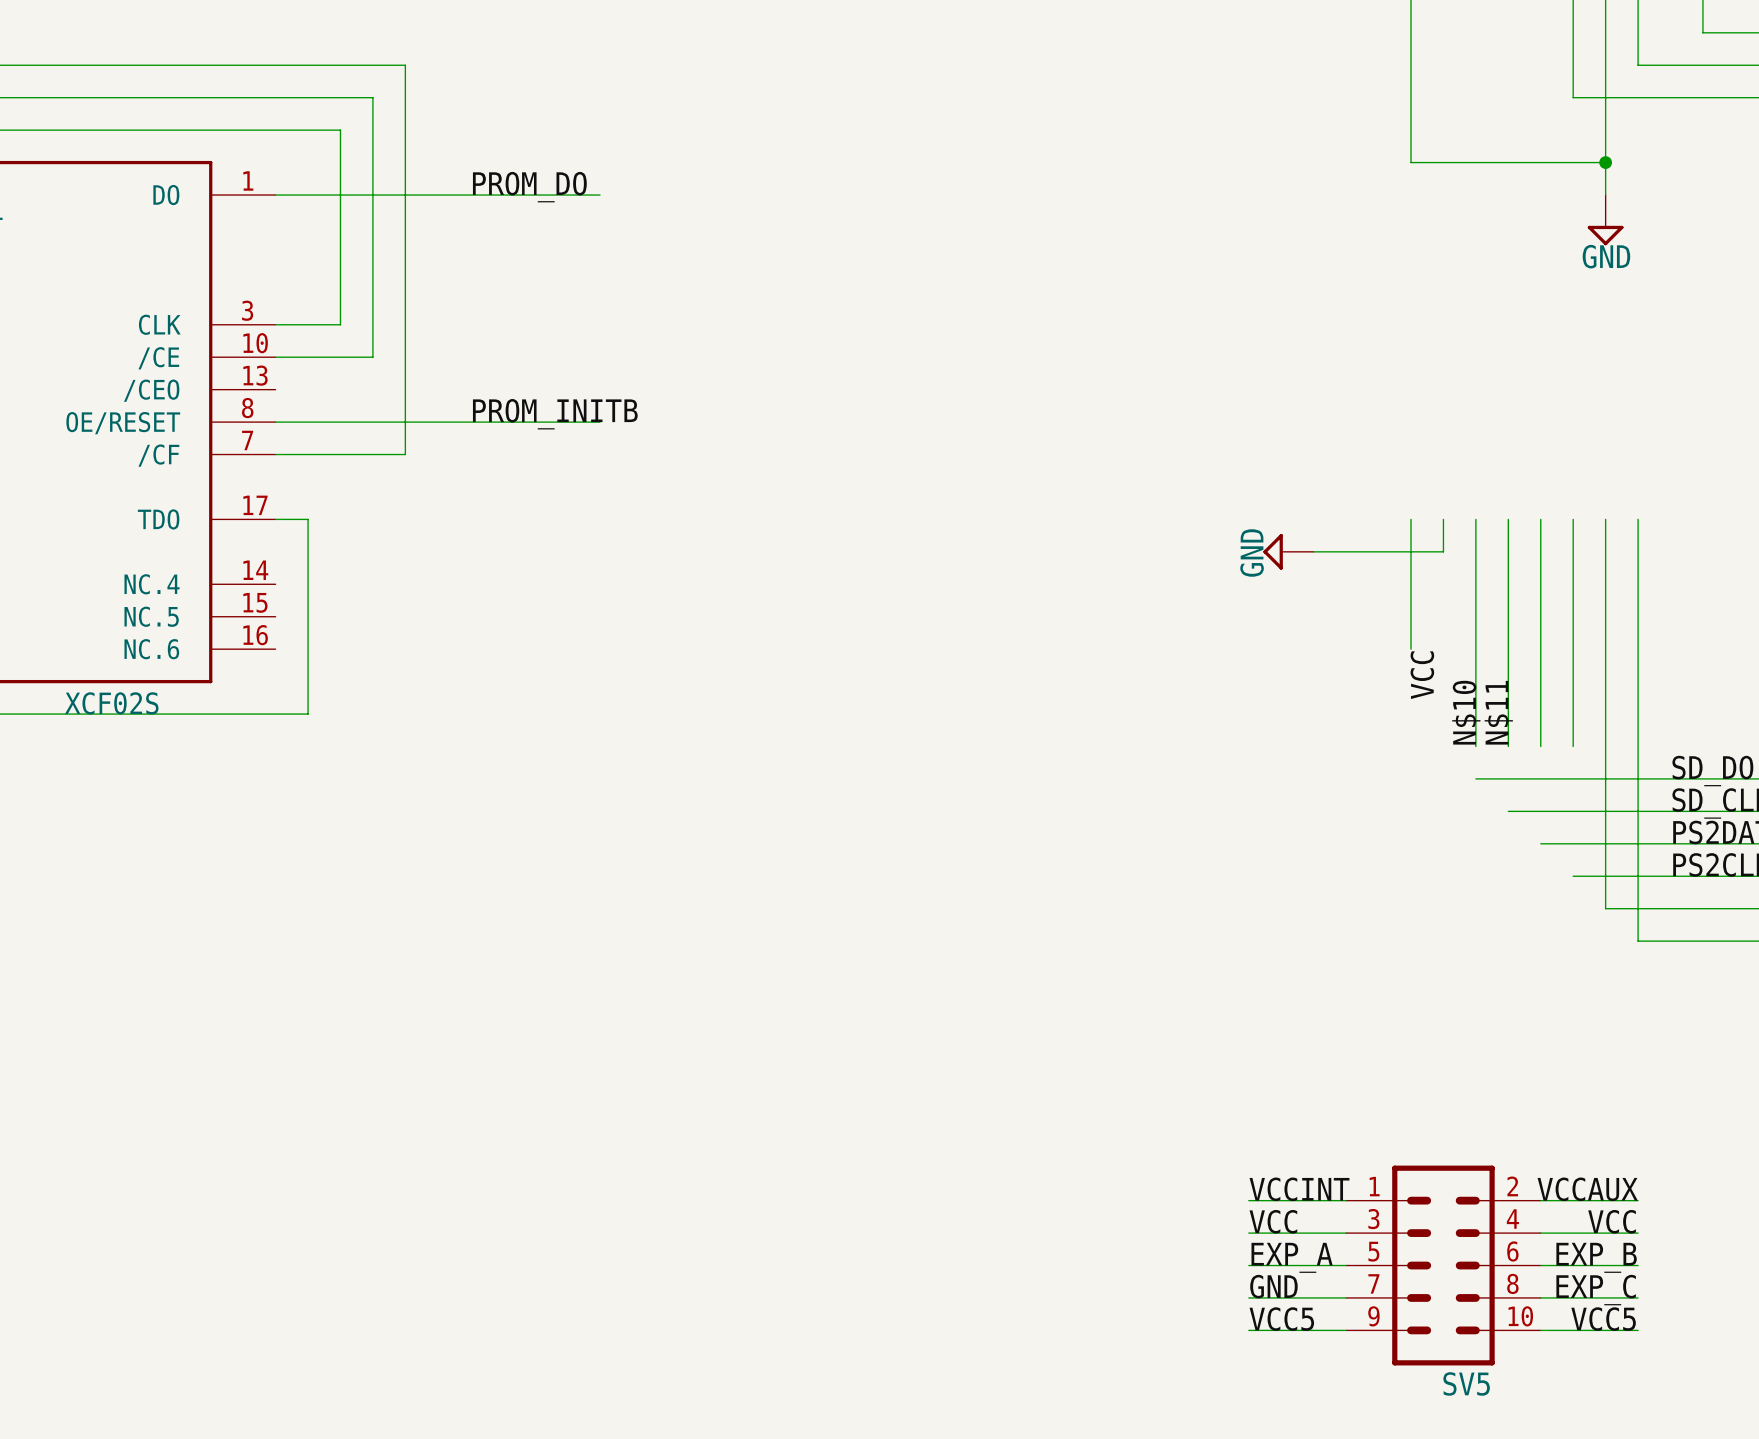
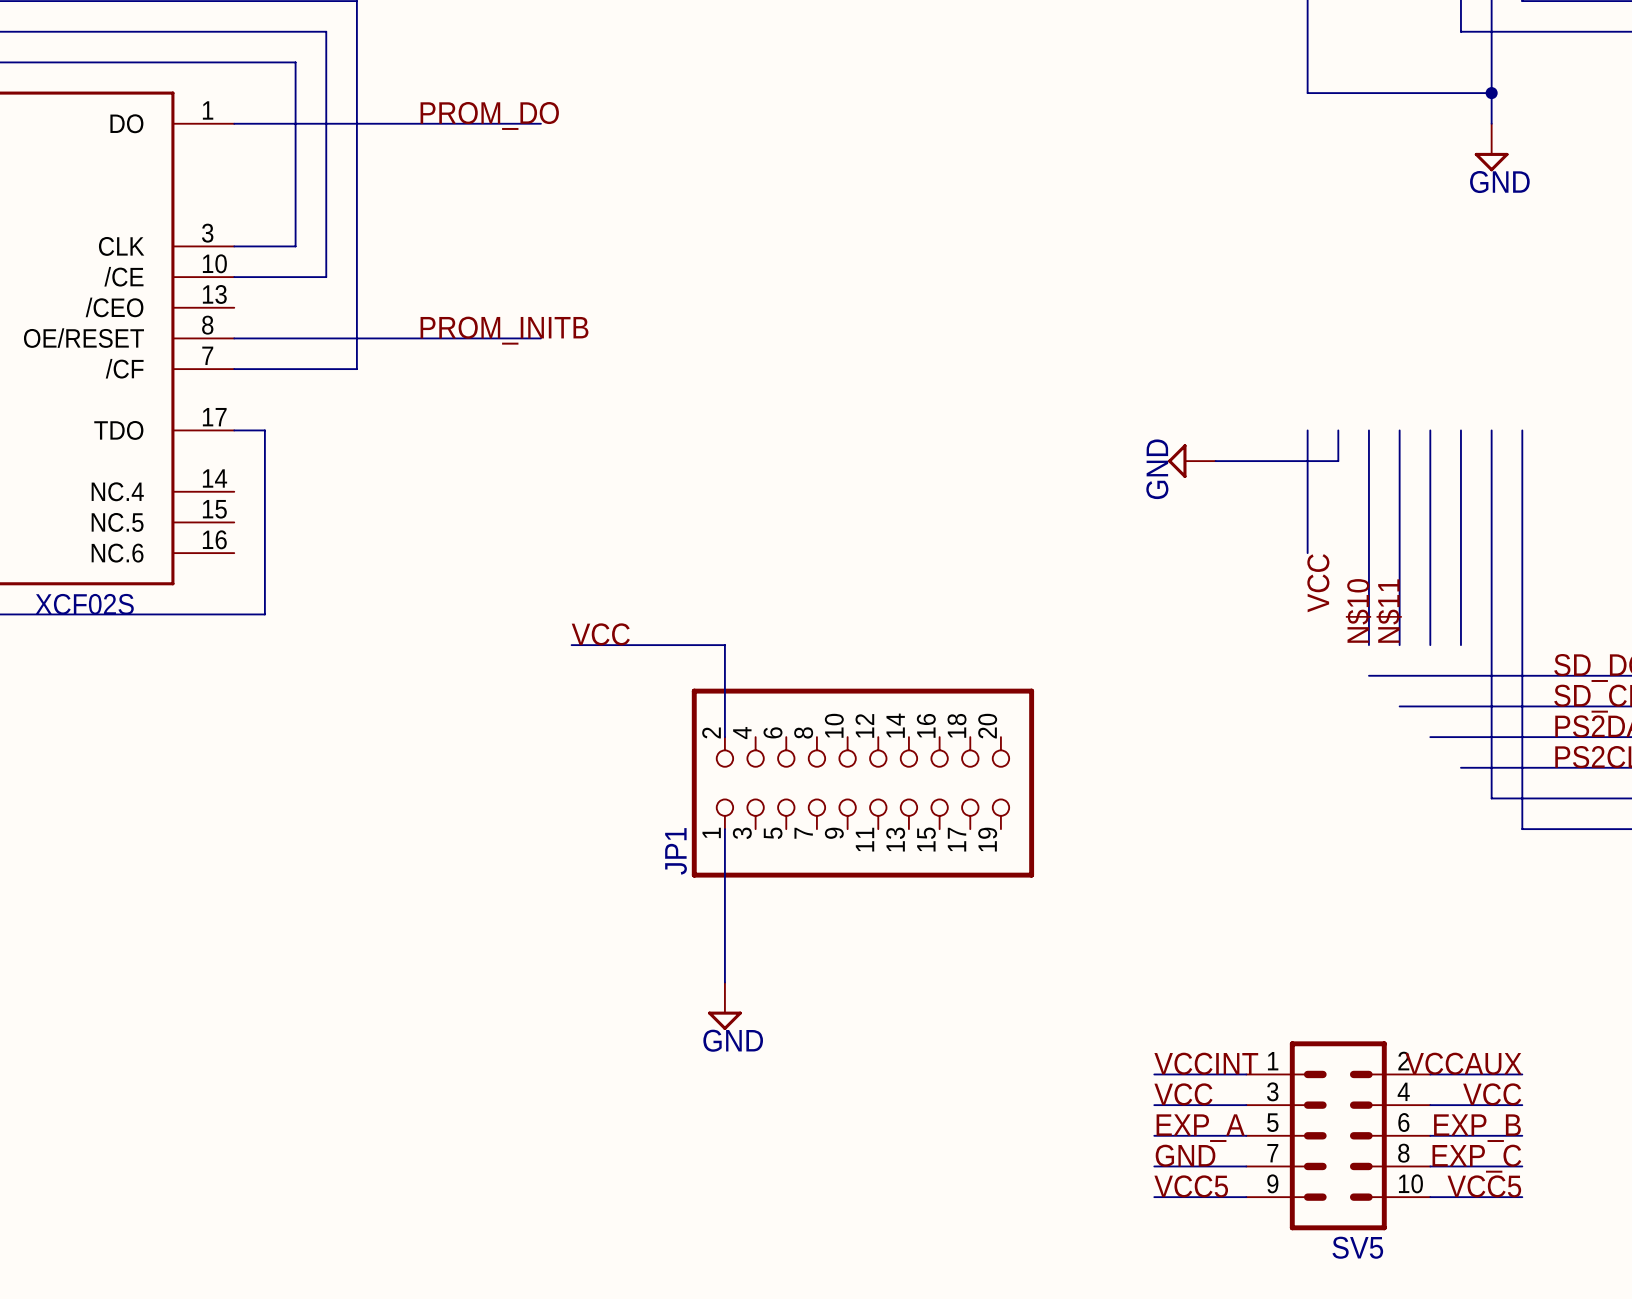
label: none -> VCC (600, 634)
wire: none -> (571, 645) (724, 645) (724, 737)
JP1: none -> (862, 783)
wire: none -> (724, 829) (724, 982)
power symbol: none -> GND (724, 1006)

